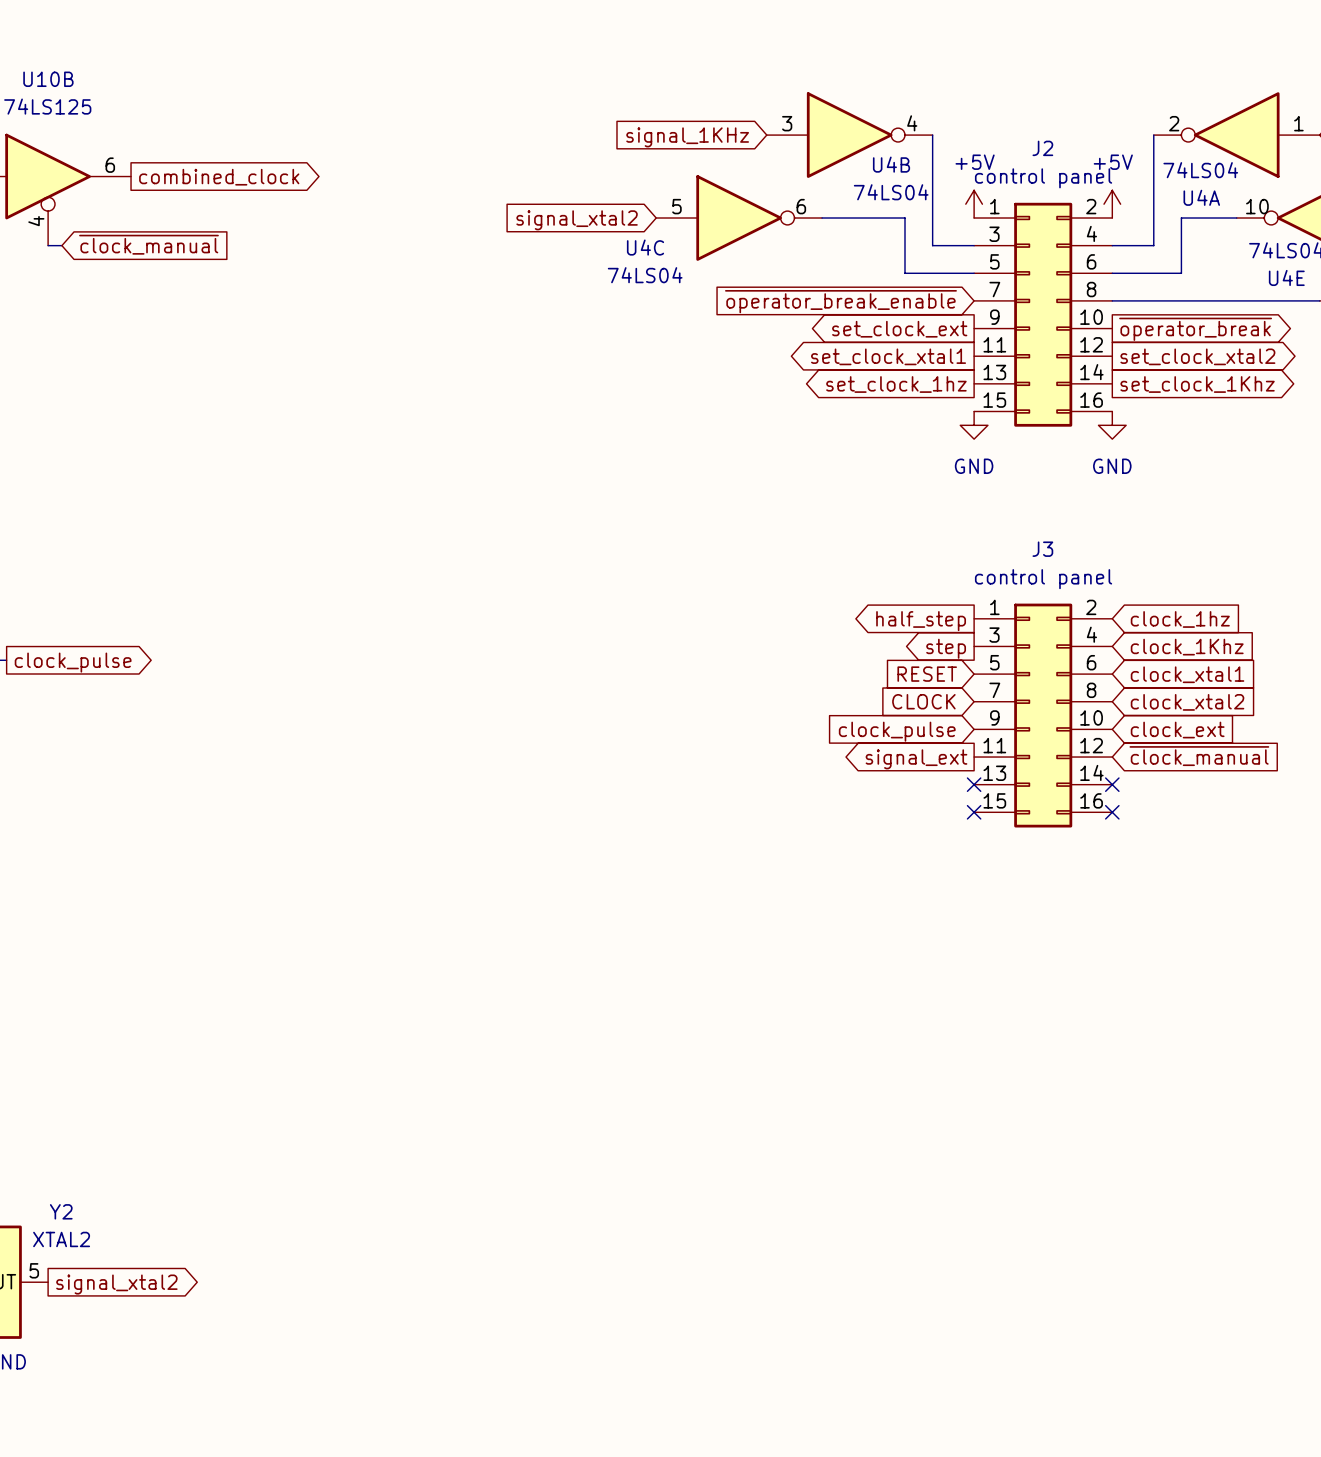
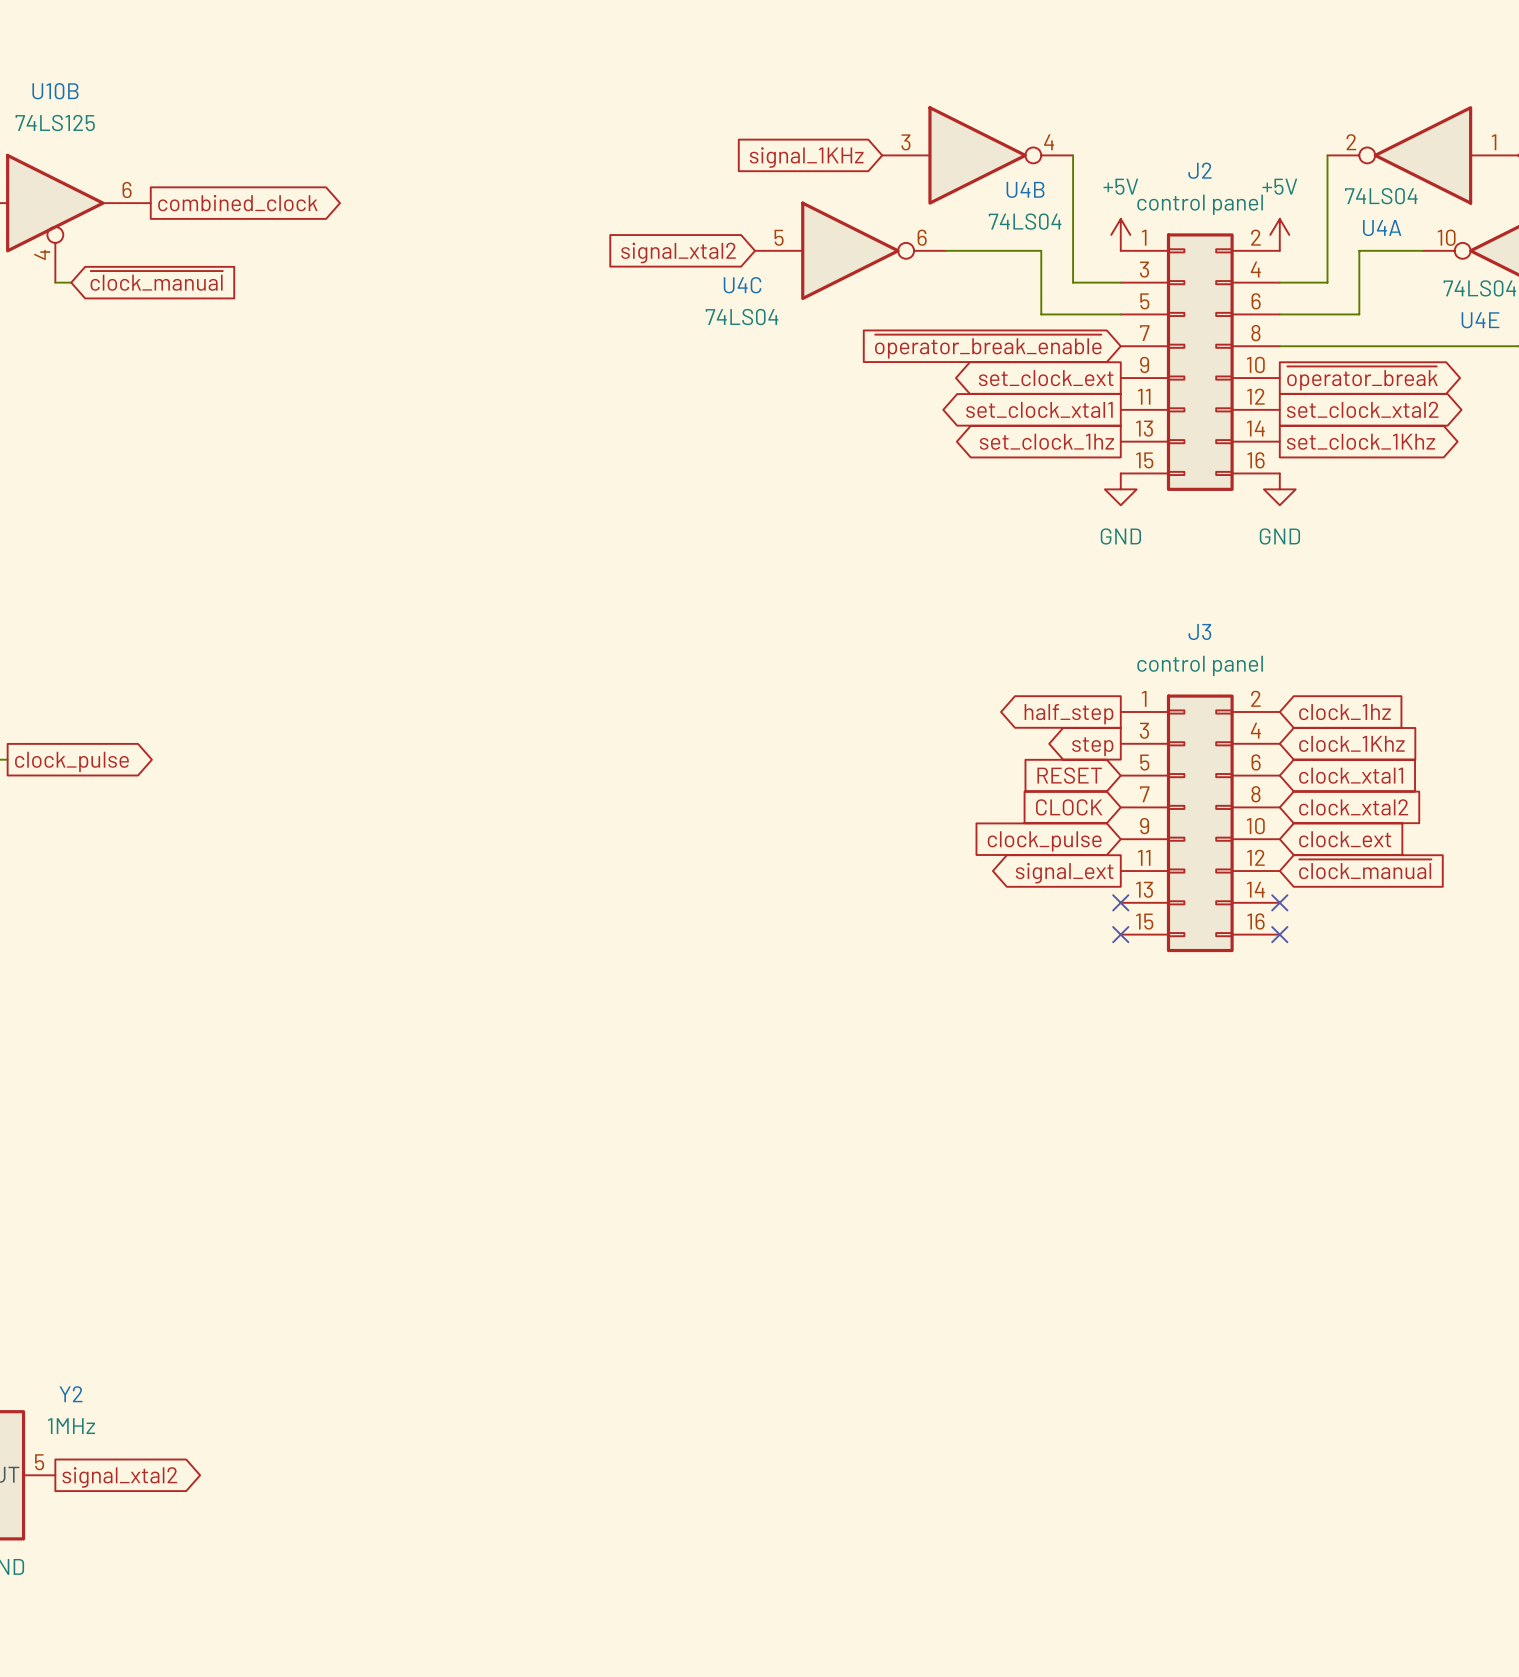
Y2 value: XTAL2 (61, 1239) -> 1MHz (71, 1426)

